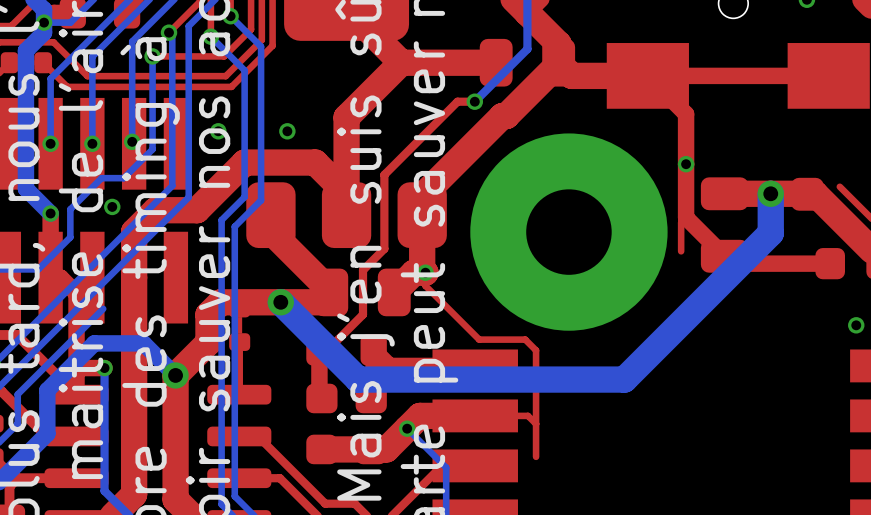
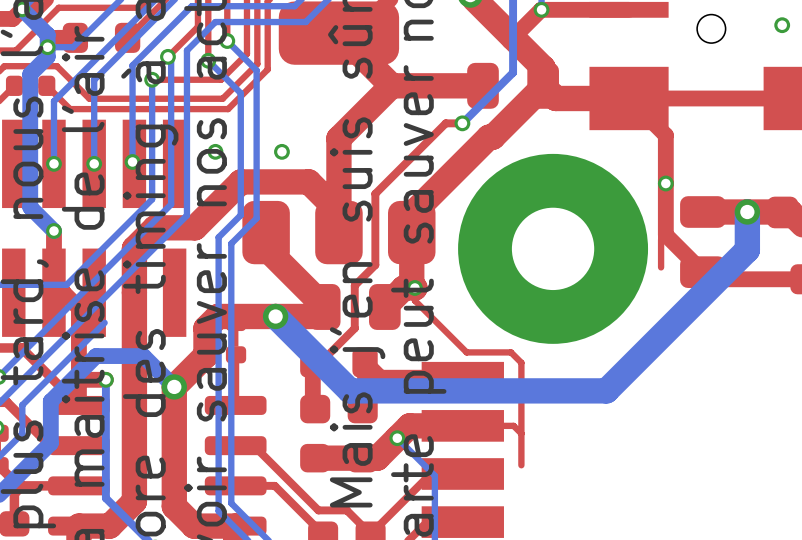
bottom track: (152, 149) (123, 178) (101, 178) (70, 209) (70, 237) (38, 269) -> (152, 169) (152, 199) (66, 284) (42, 284)
via: (112, 206) -> none

